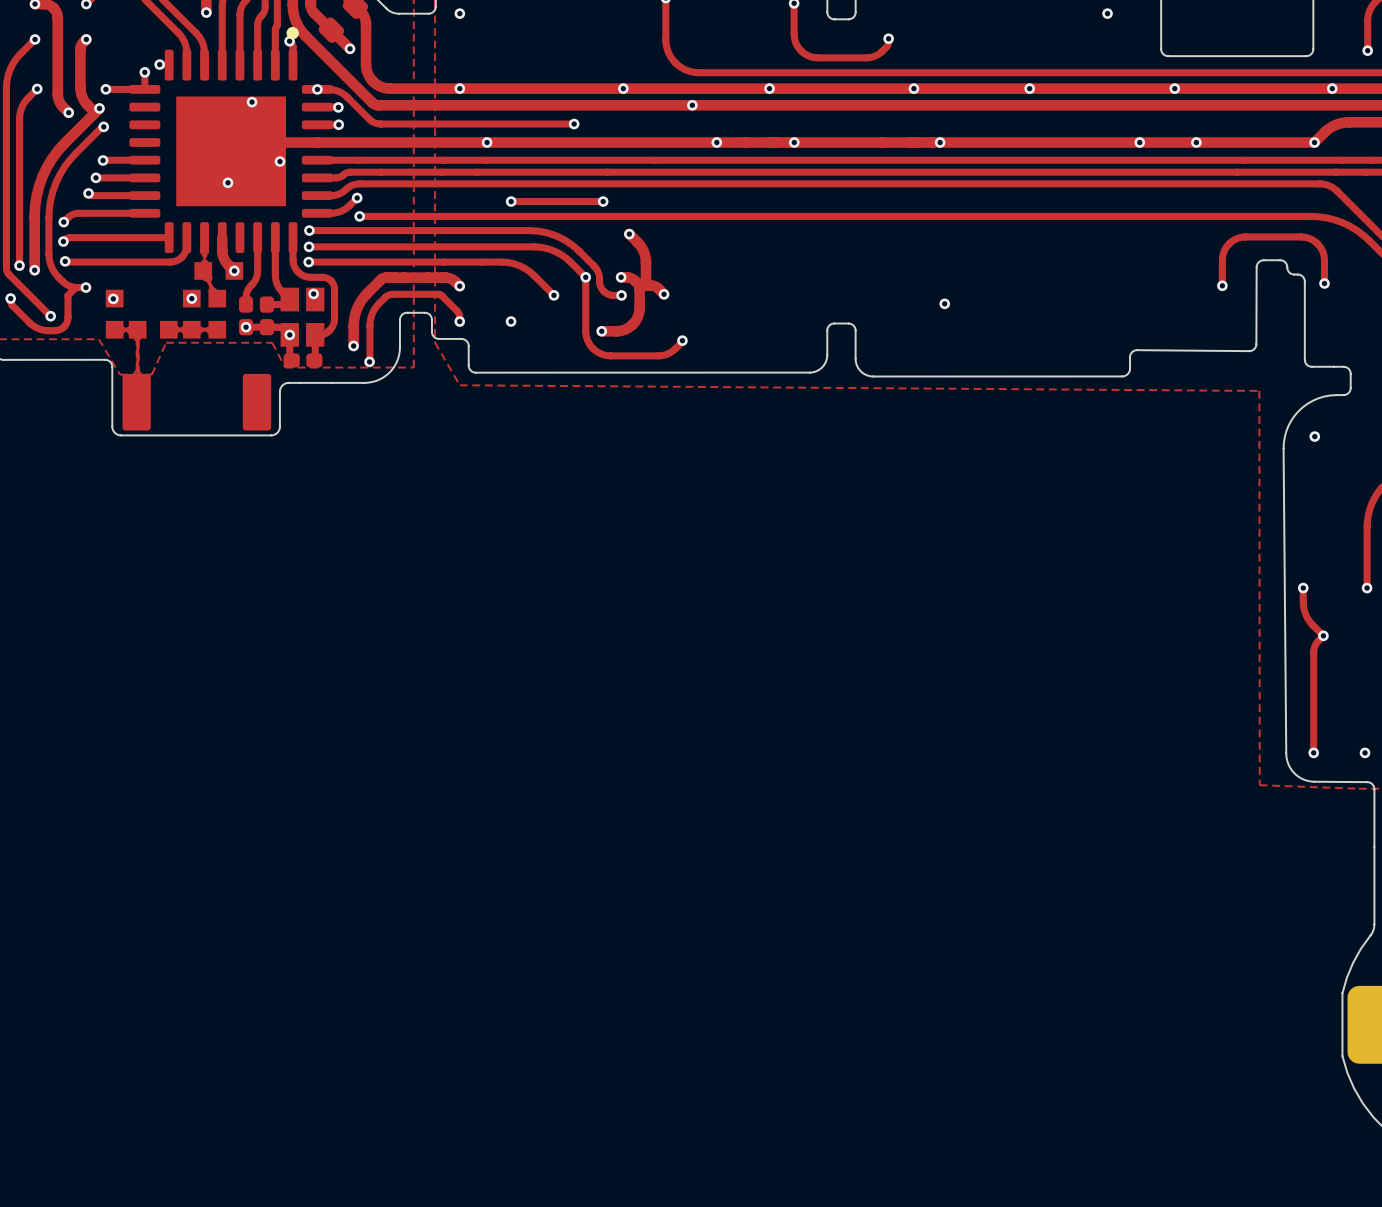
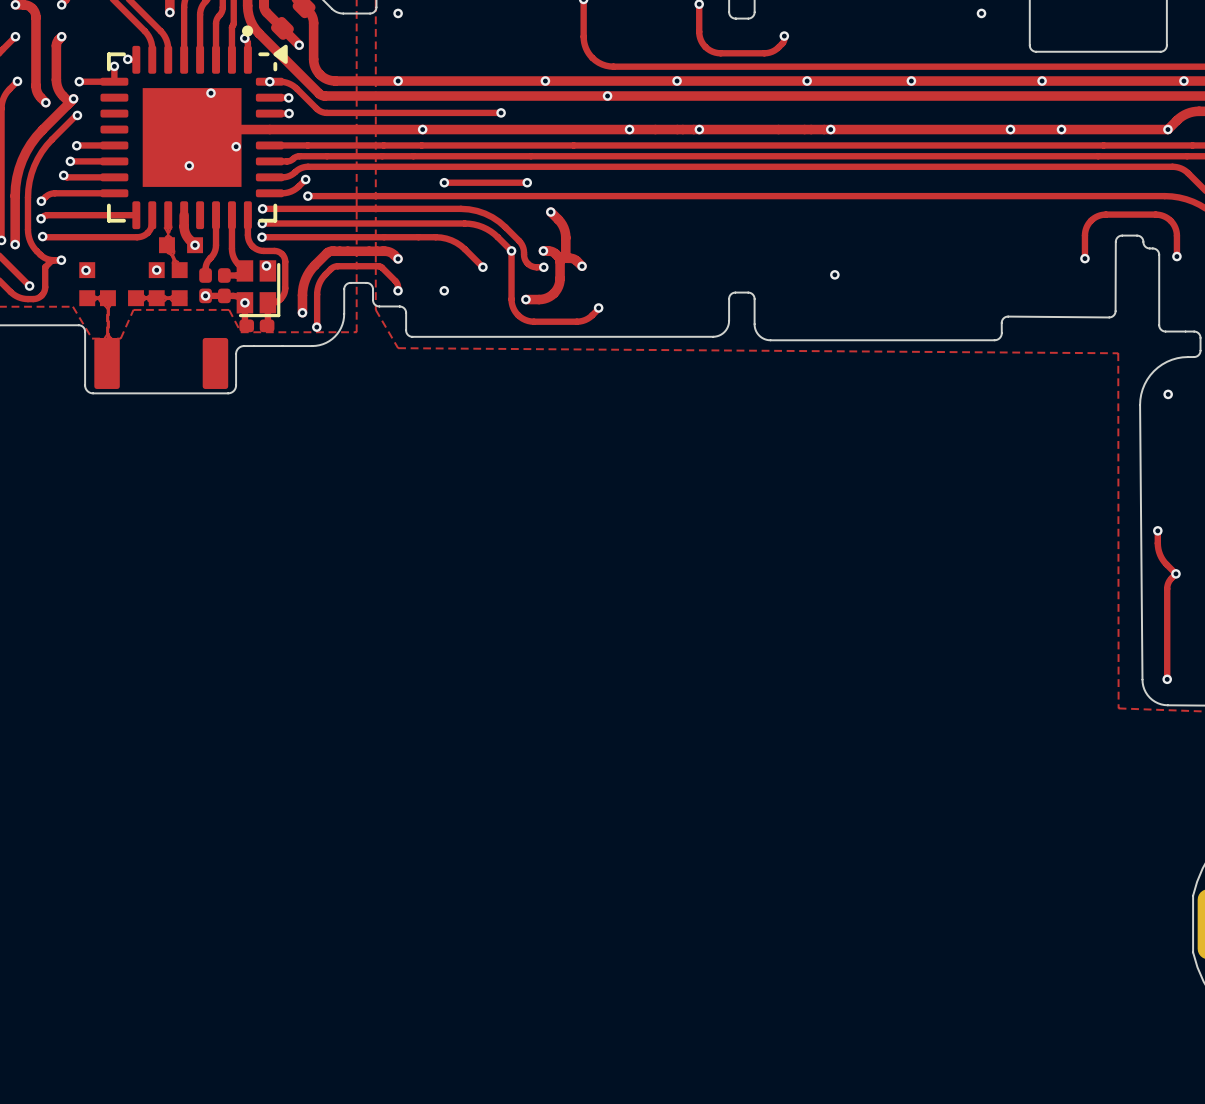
part footprint: [129, 49, 333, 254] -> [100, 44, 288, 230]
part footprint: [280, 287, 325, 347] -> [236, 260, 281, 318]

